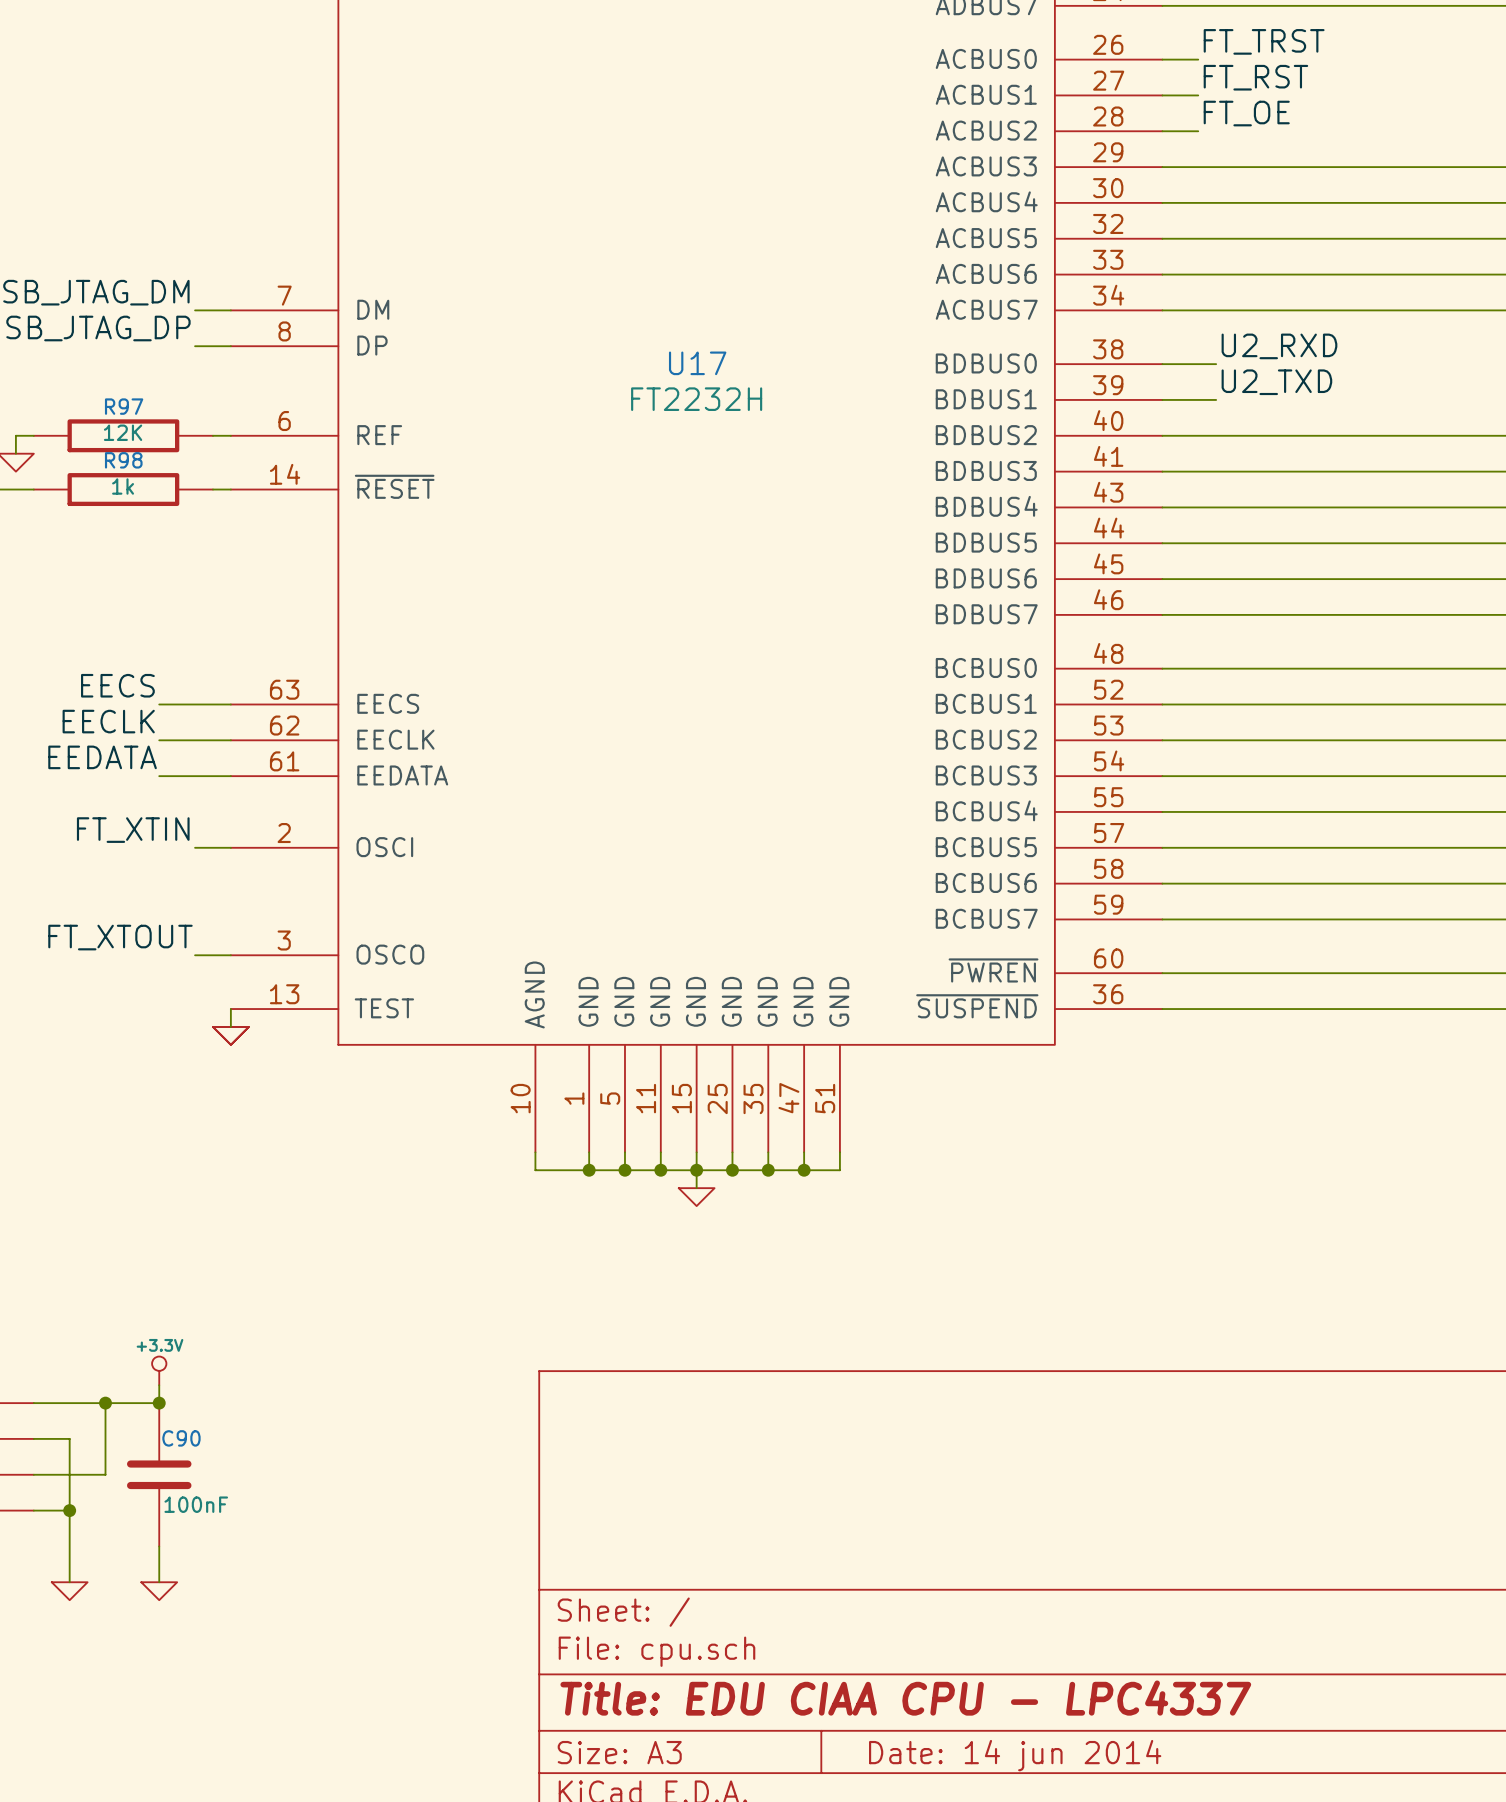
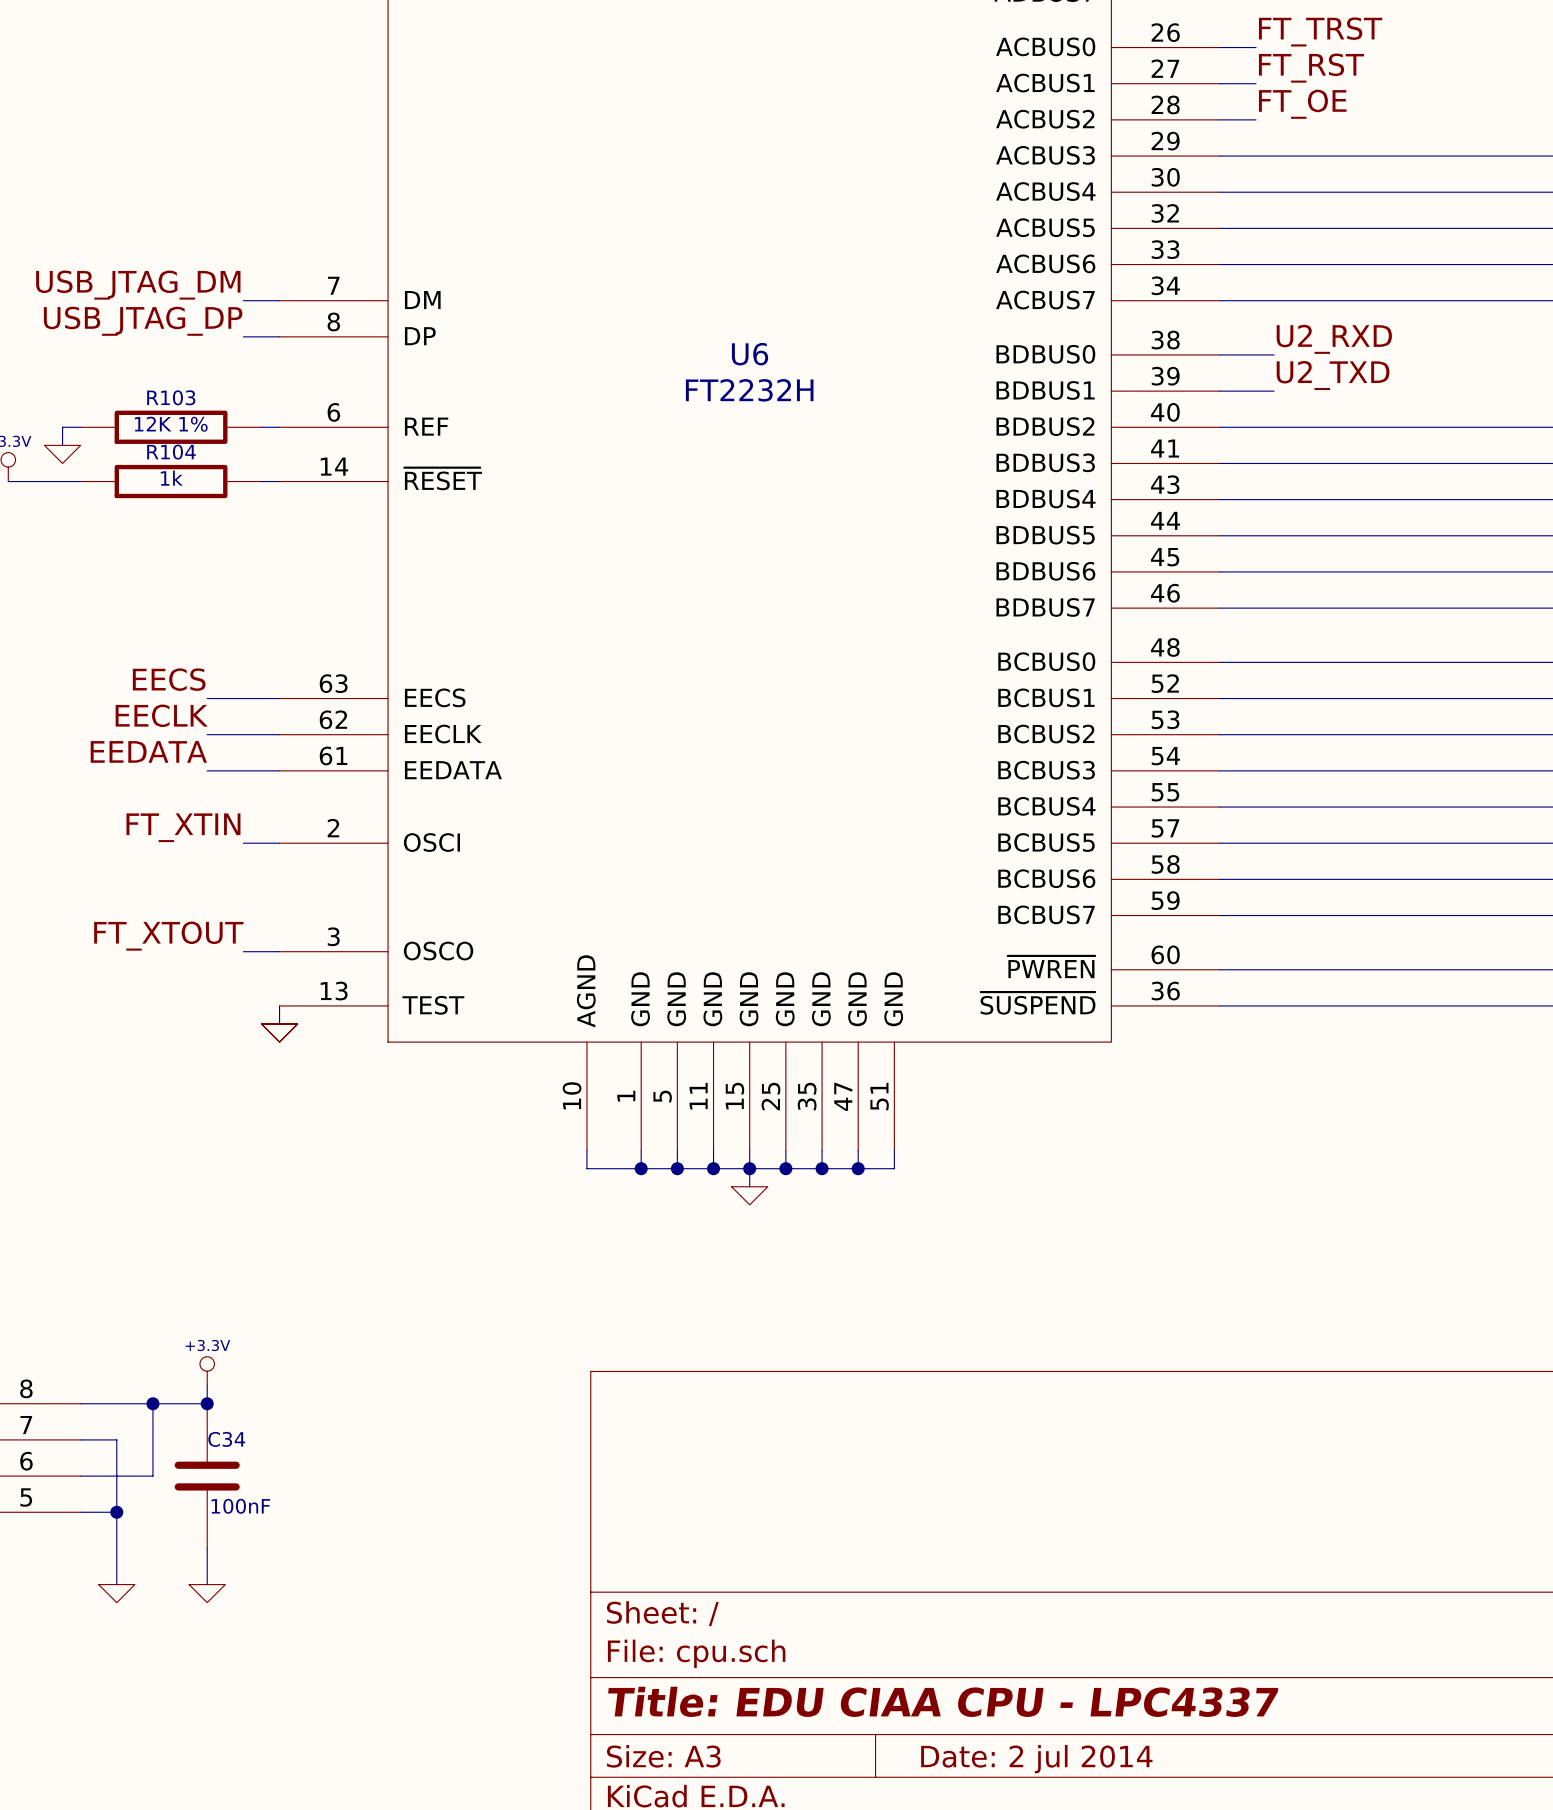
U17 name: U17 (697, 363) -> U6 (750, 354)
R97 name: R97 (124, 406) -> R103 (171, 397)
R97 value: 12K (123, 432) -> 12K 1% (171, 424)
R98 name: R98 (123, 460) -> R104 (171, 452)
C90 name: C90 (181, 1438) -> C34 (226, 1439)
title block: Date: 14 jun 2014 (1015, 1755) -> Date: 2 jul 2014 (1036, 1759)

